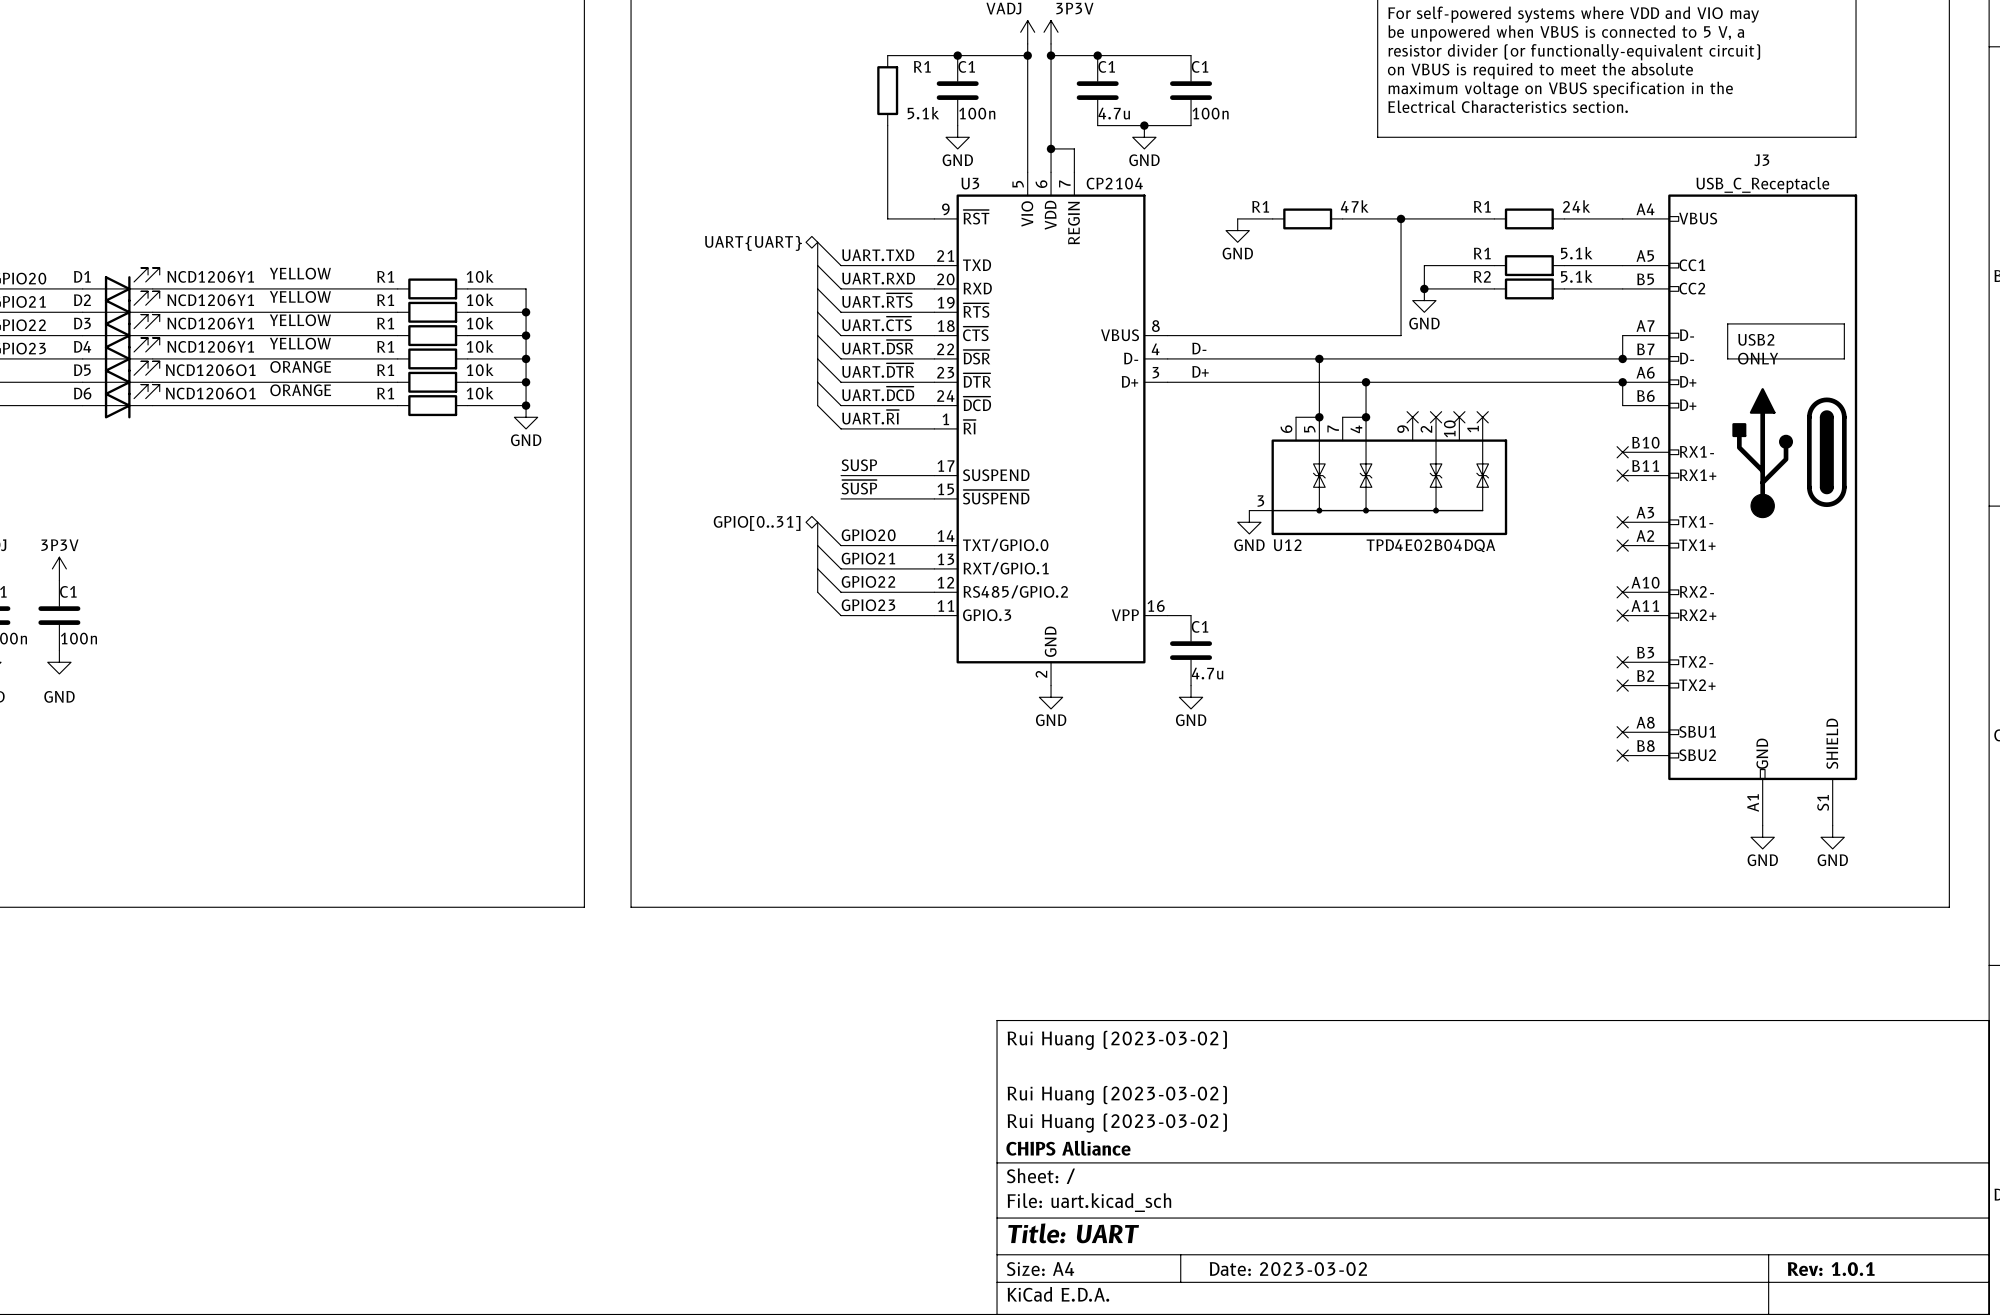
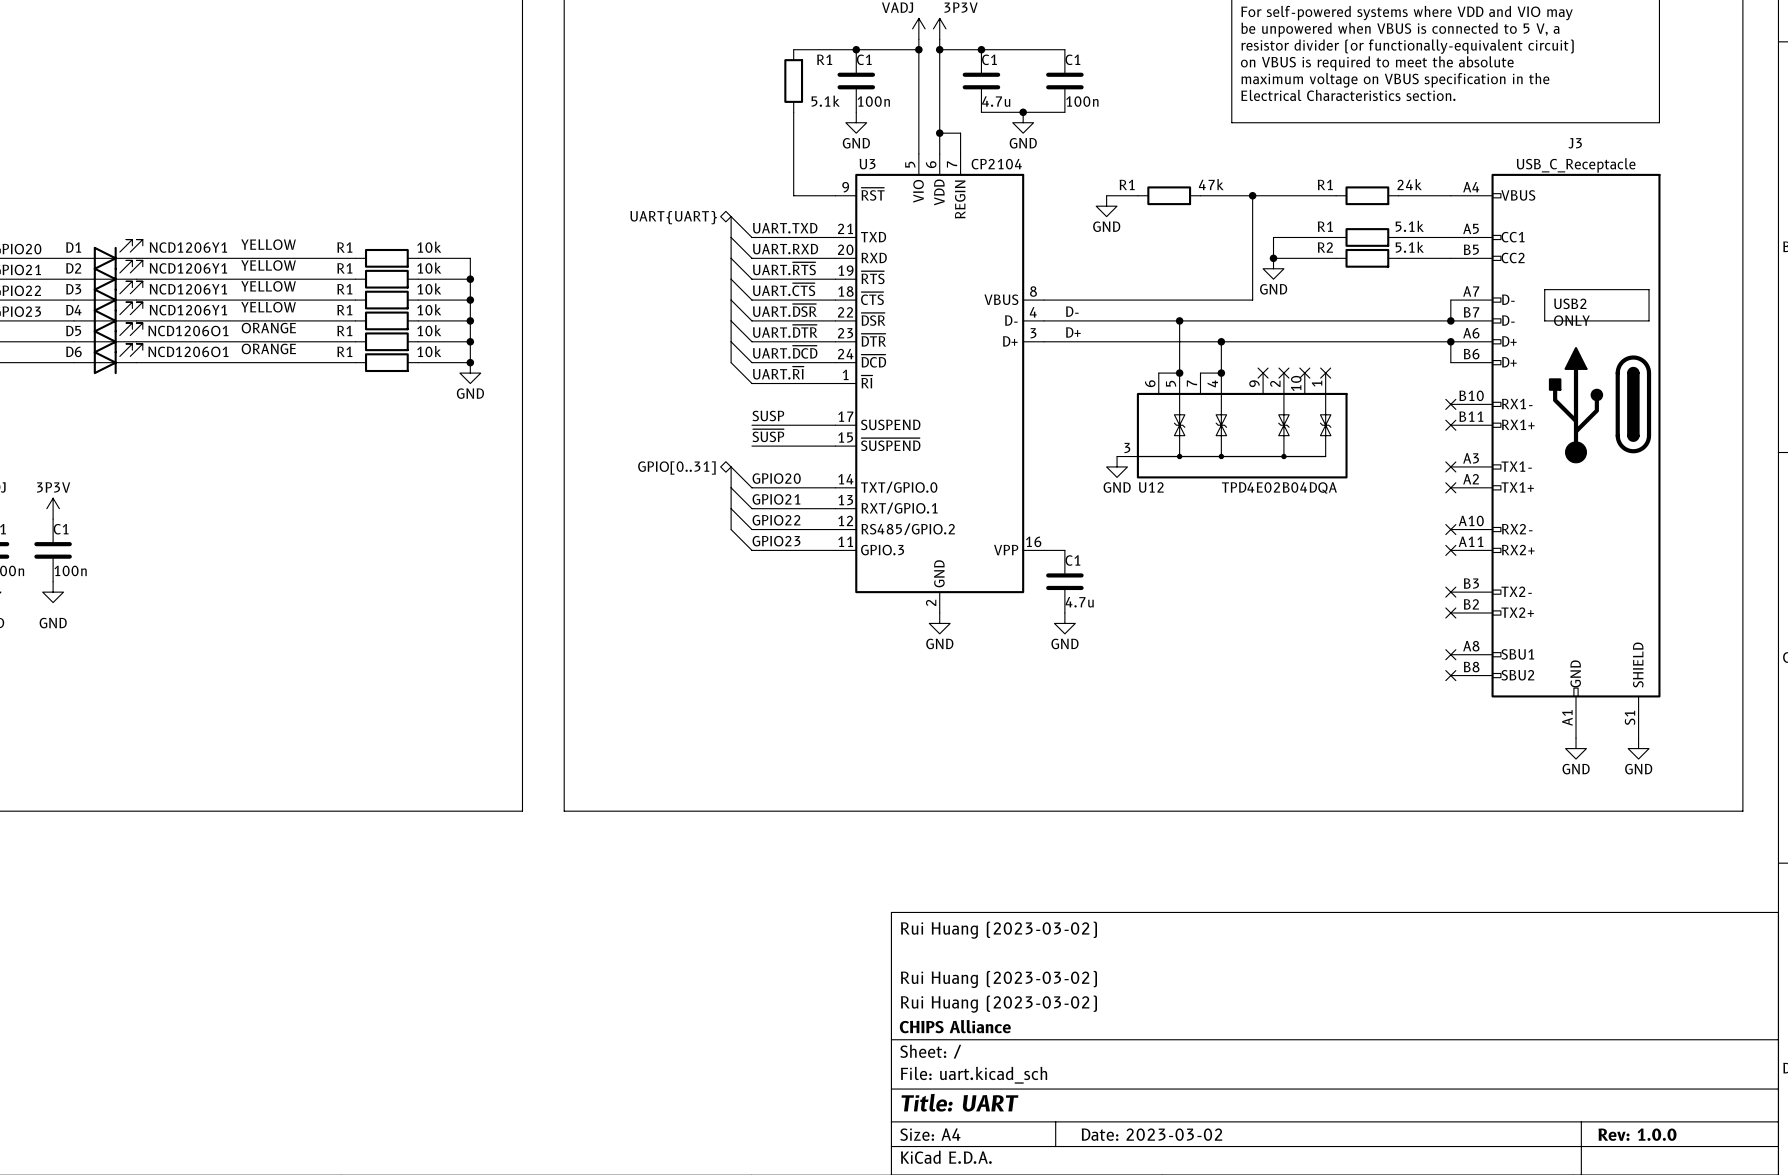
title block: Rev: 1.0.1 (1831, 1269) -> Rev: 1.0.0 (1637, 1134)

